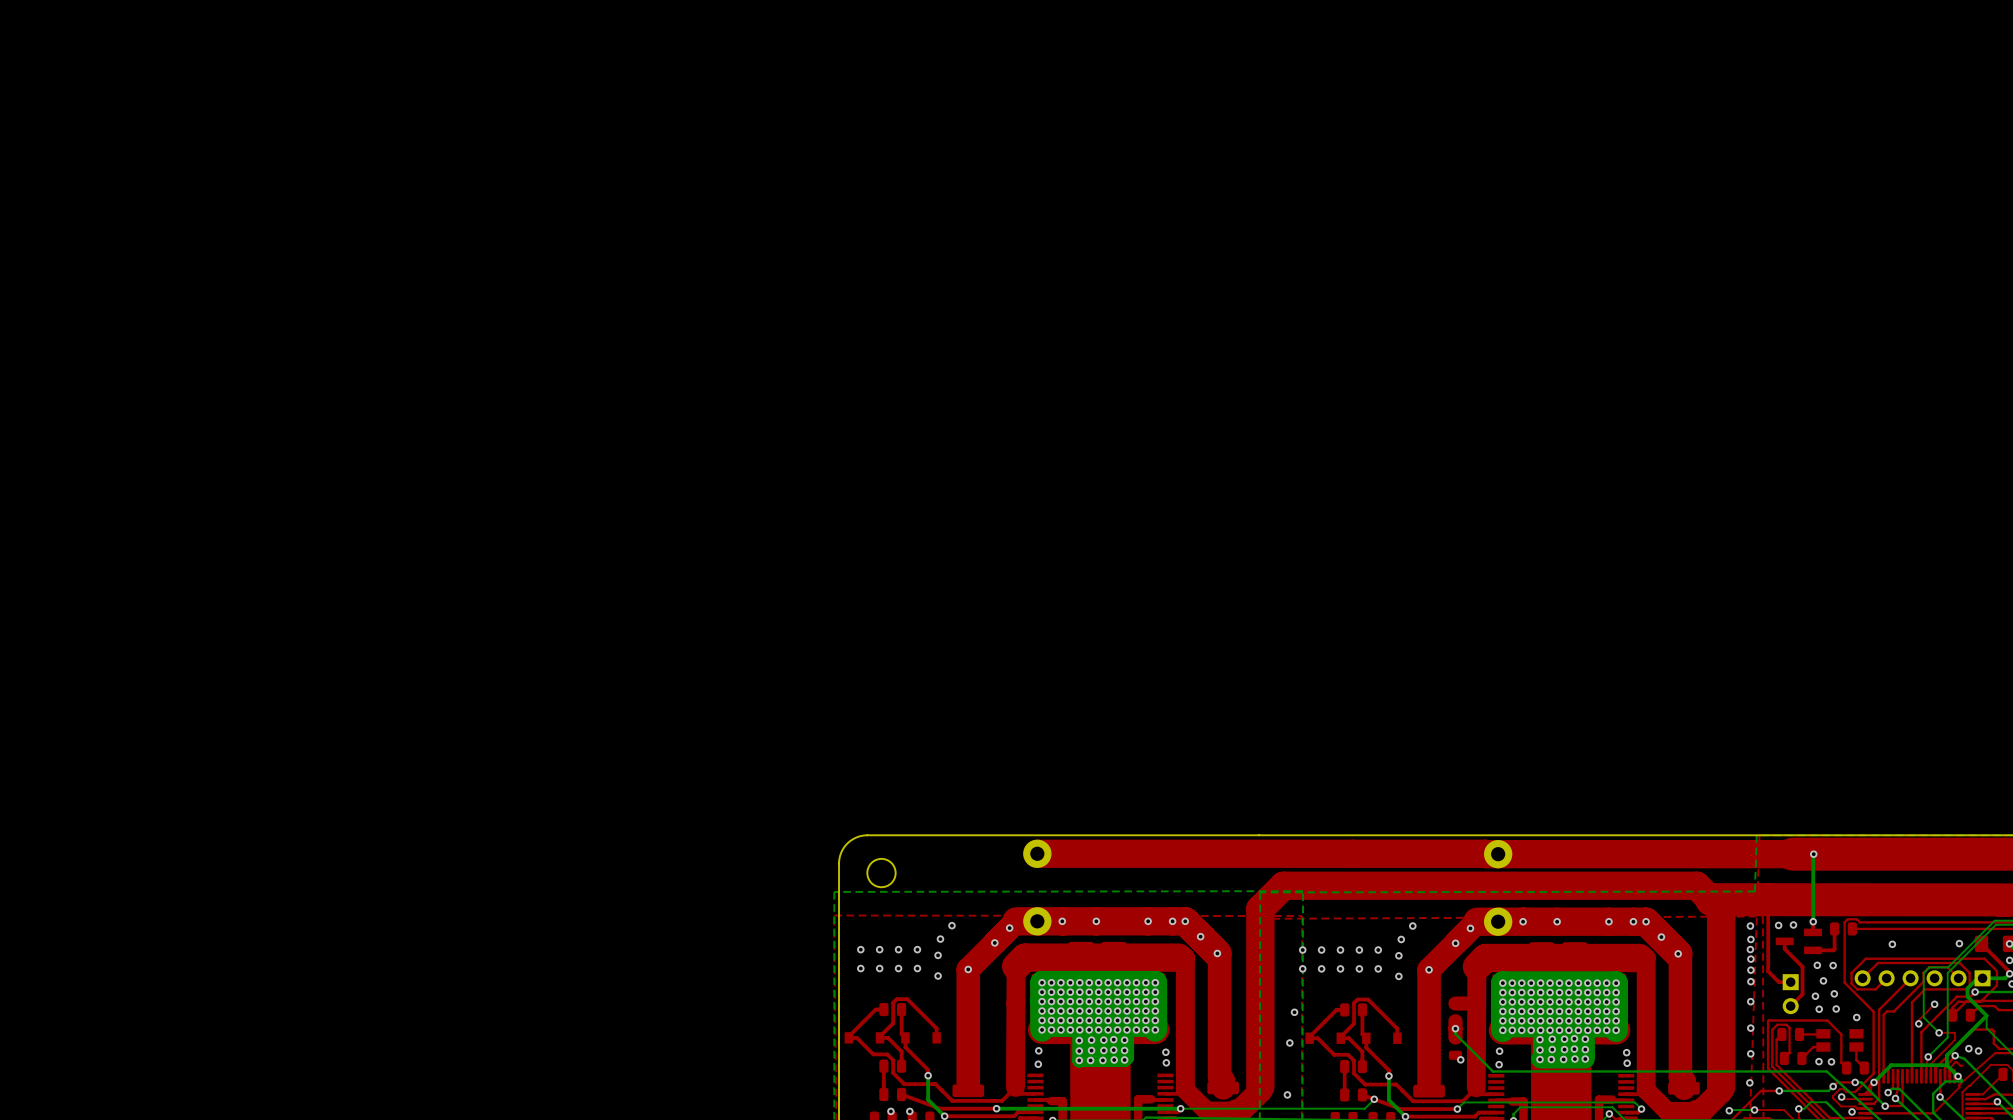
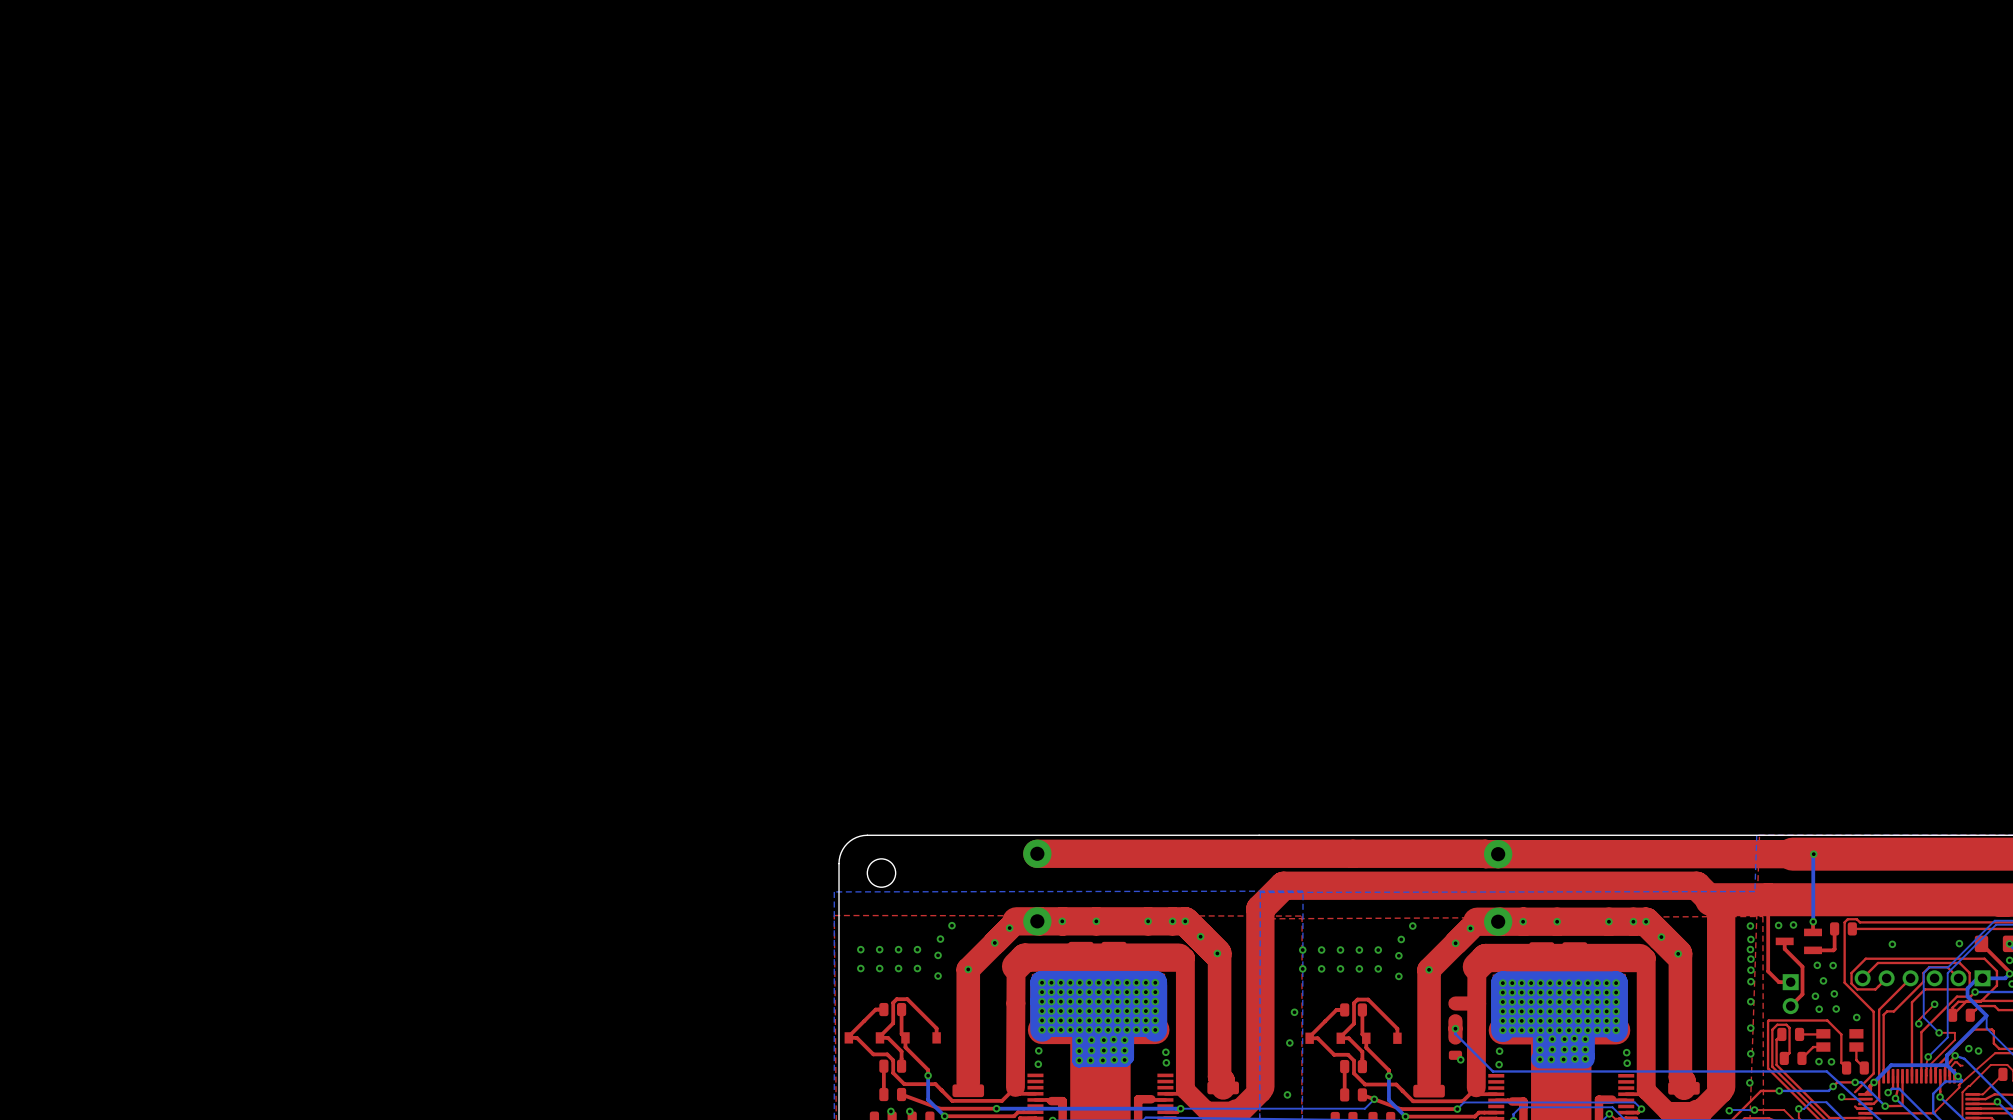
top track: (1855, 1092) (1846, 1092) (1843, 1089) (1839, 1089) (1833, 1095) (1833, 1098) (1841, 1106) (1855, 1106) -> none
via: (1852, 1111) -> none

